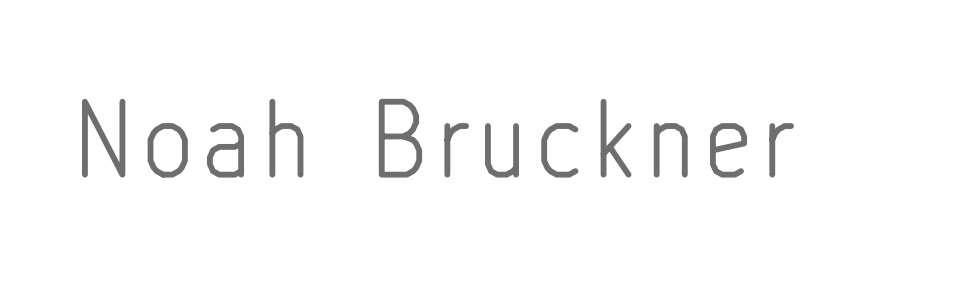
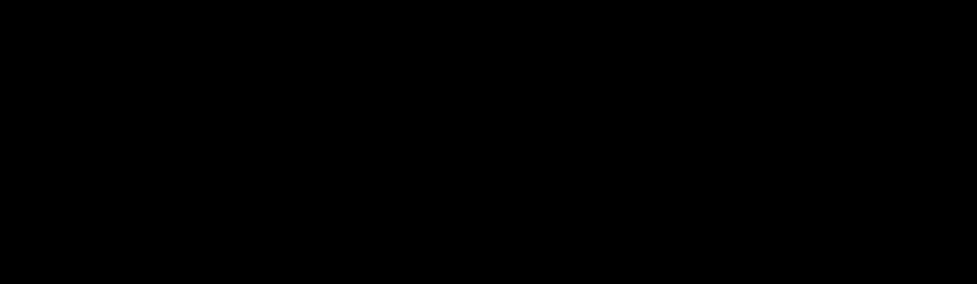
text: Noah Bruckner (437, 138) -> none

